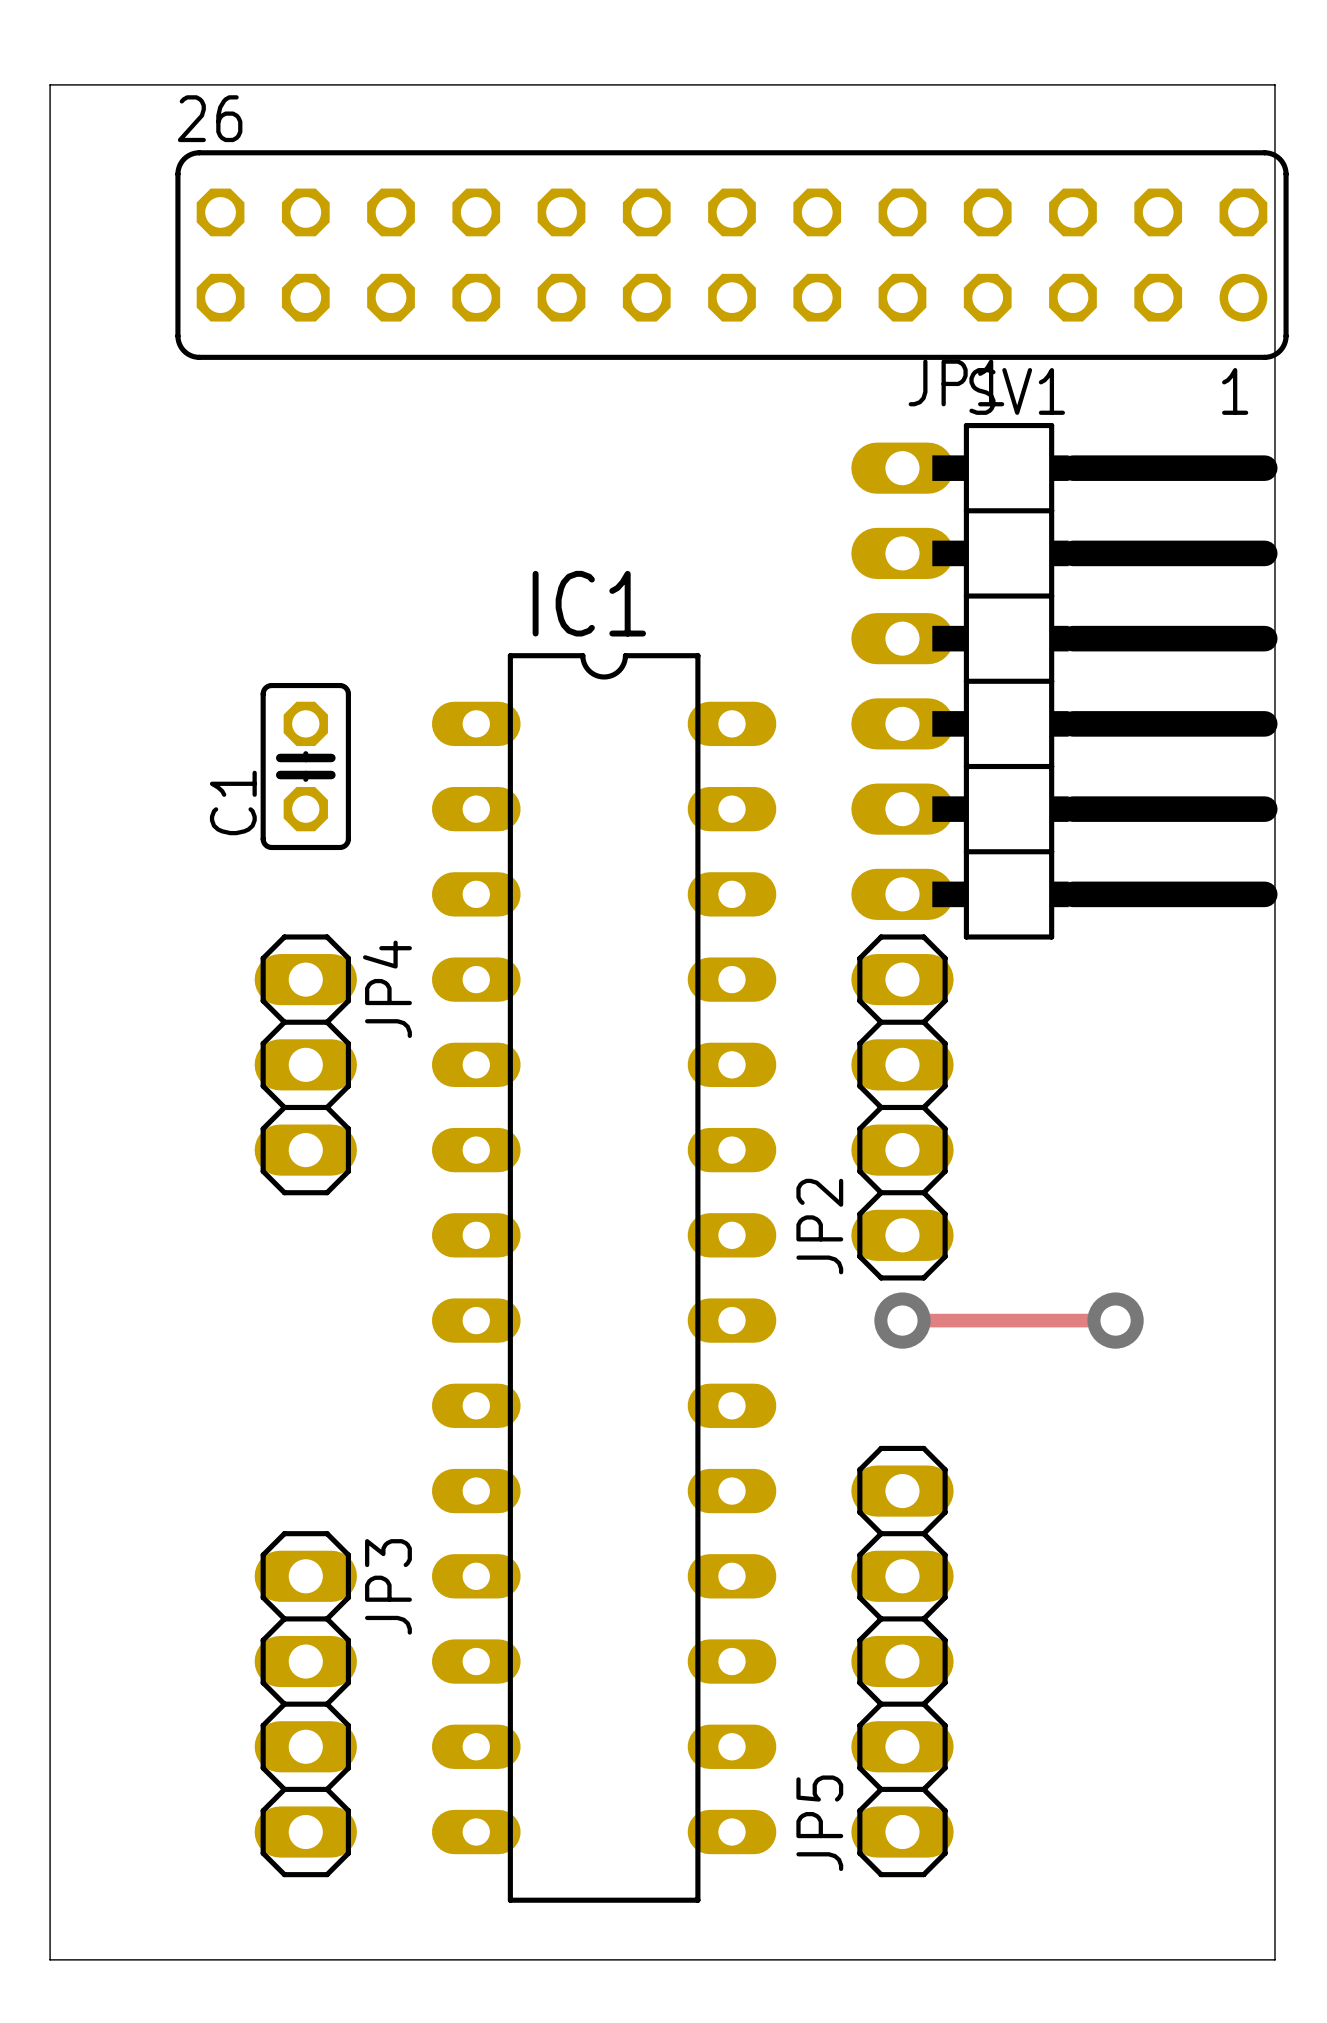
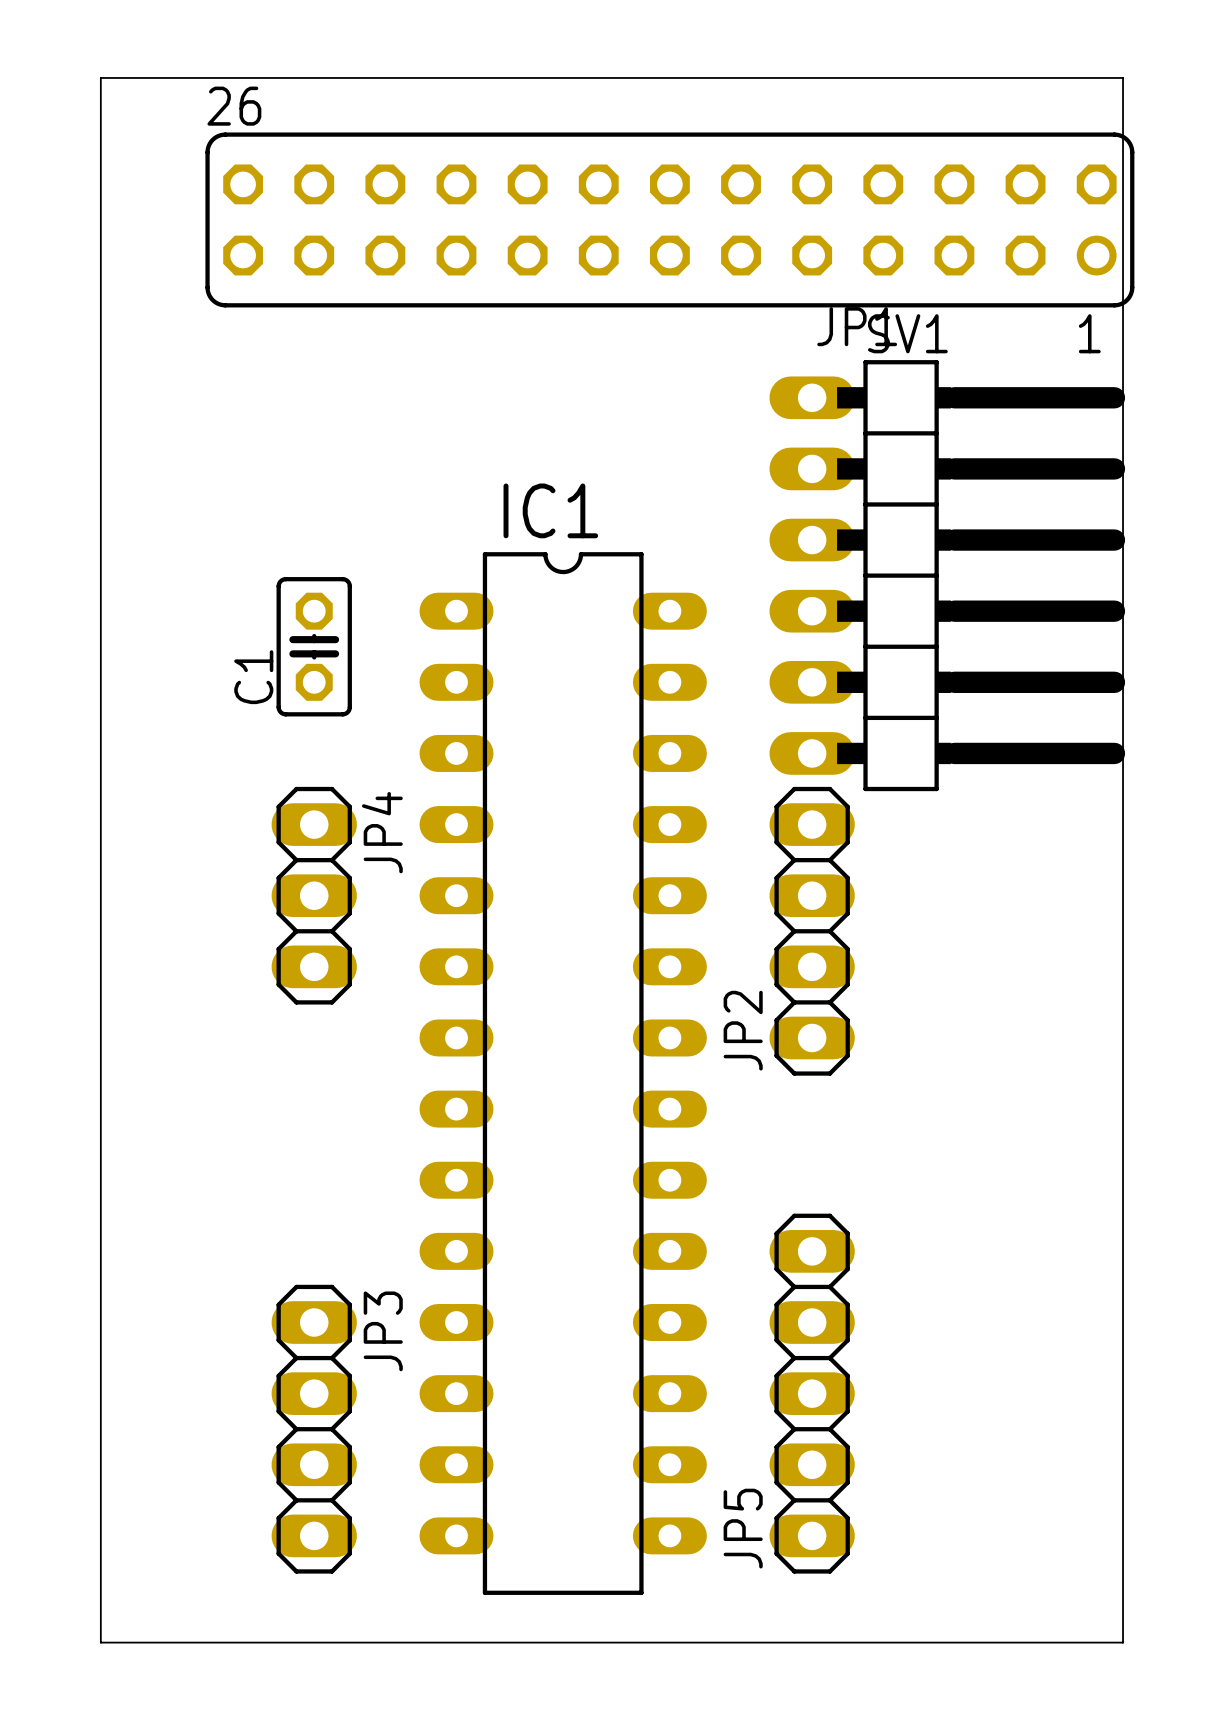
track: (902, 1320) (1115, 1320) -> none
via: (902, 1320) -> none
via: (1115, 1320) -> none

